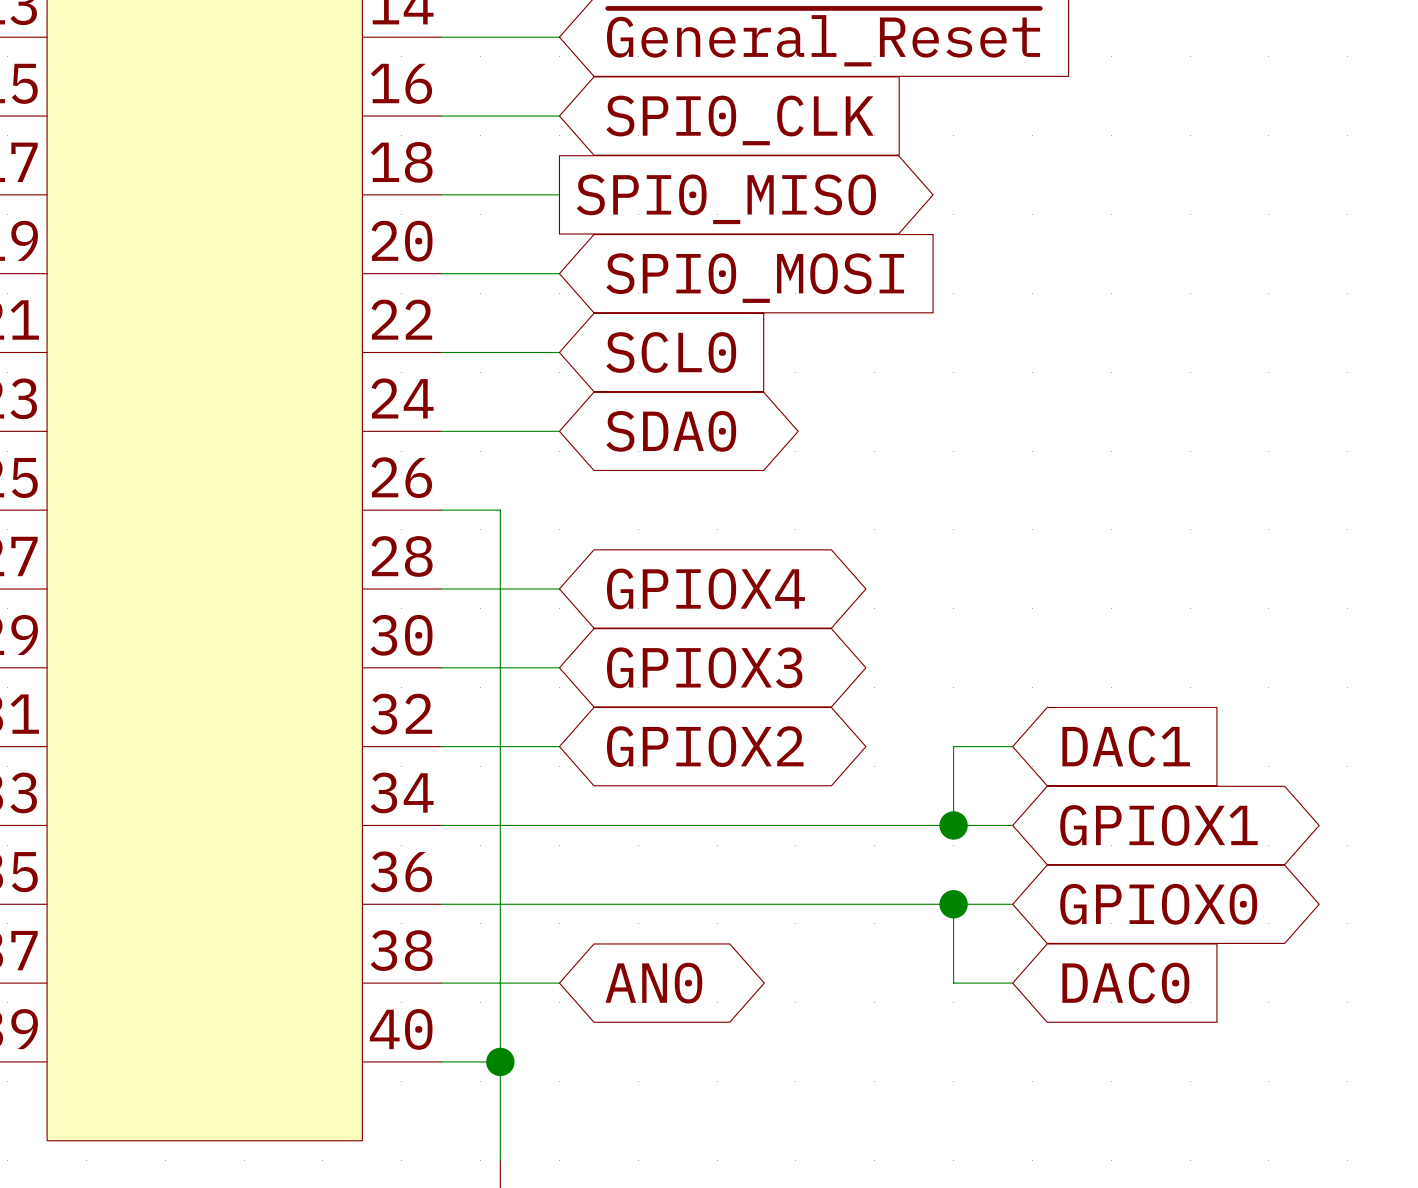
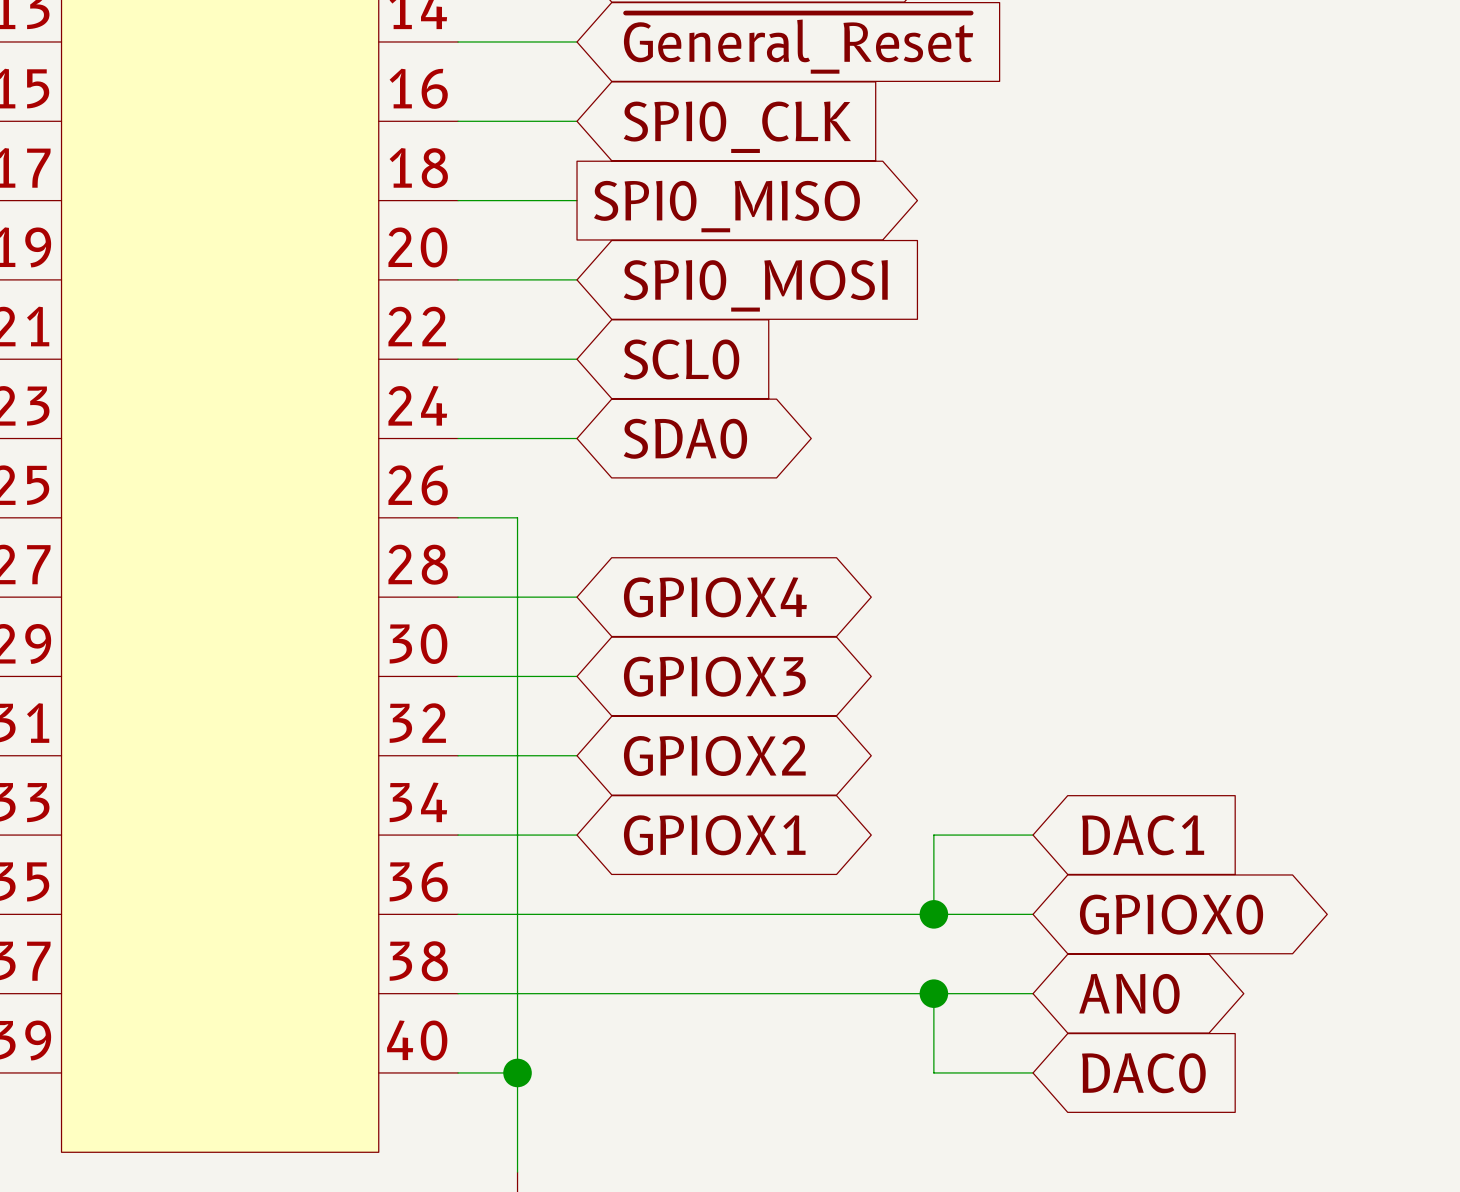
wire: (1012, 746) (953, 746) (953, 825) -> none
global label: DAC1 (1126, 746) -> none
wire: (559, 825) (914, 825) -> (933, 914) (933, 835)
global label: none -> GPIOX1 (714, 835)
junction: (953, 825) -> none
global label shape: bidirectional (1158, 825) -> input (1143, 835)
global label: GPIOX1 (1158, 825) -> DAC1 (1143, 835)
wire: (953, 904) (953, 983) -> (577, 993) (973, 993)
junction position: (953, 904) -> (933, 914)
global label: AN0 (653, 983) -> none
wire: none -> (933, 993) (933, 1072) (1033, 1072)
junction: none -> (933, 993)
global label shape: input (1125, 983) -> bidirectional (1129, 993)
global label: DAC0 (1125, 983) -> AN0 (1129, 993)
global label: none -> DAC0 (1143, 1073)

